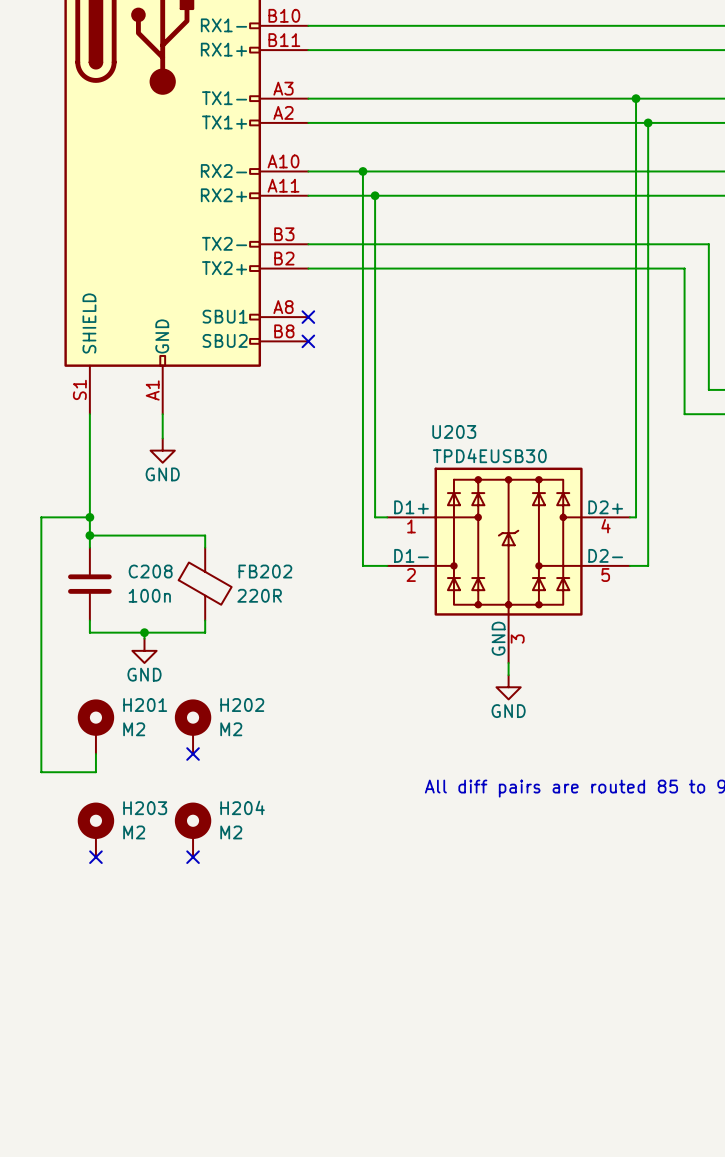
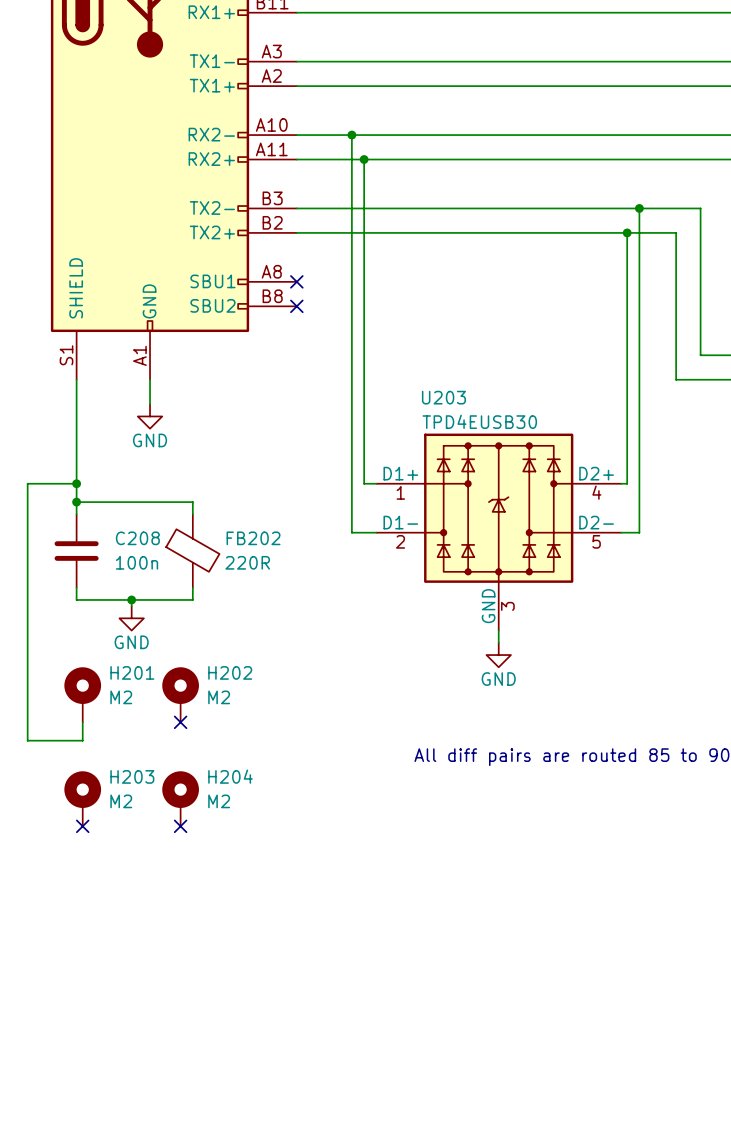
wire: (636, 98) (636, 268) -> none
junction: (636, 98) -> none
wire: (648, 122) (648, 244) -> none
junction: (648, 122) -> none
junction: none -> (639, 208)
junction: none -> (627, 232)

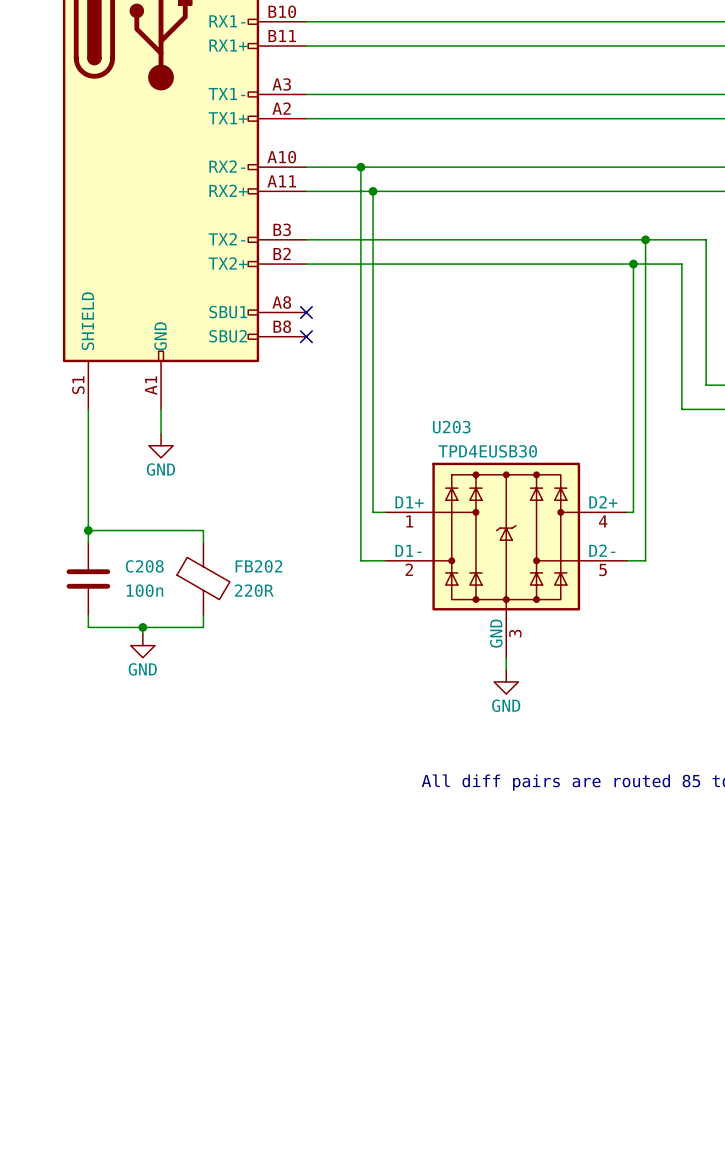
wire: (76, 483) (27, 483) (27, 740) (82, 740) (82, 722) -> none
junction: (76, 483) -> none
H201: M2 (82, 694) -> none
H202: M2 (180, 694) -> none
no-connect mark: (180, 722) -> none
H203: M2 (82, 798) -> none
H204: M2 (180, 798) -> none
no-connect mark: (82, 826) -> none
no-connect mark: (180, 826) -> none

